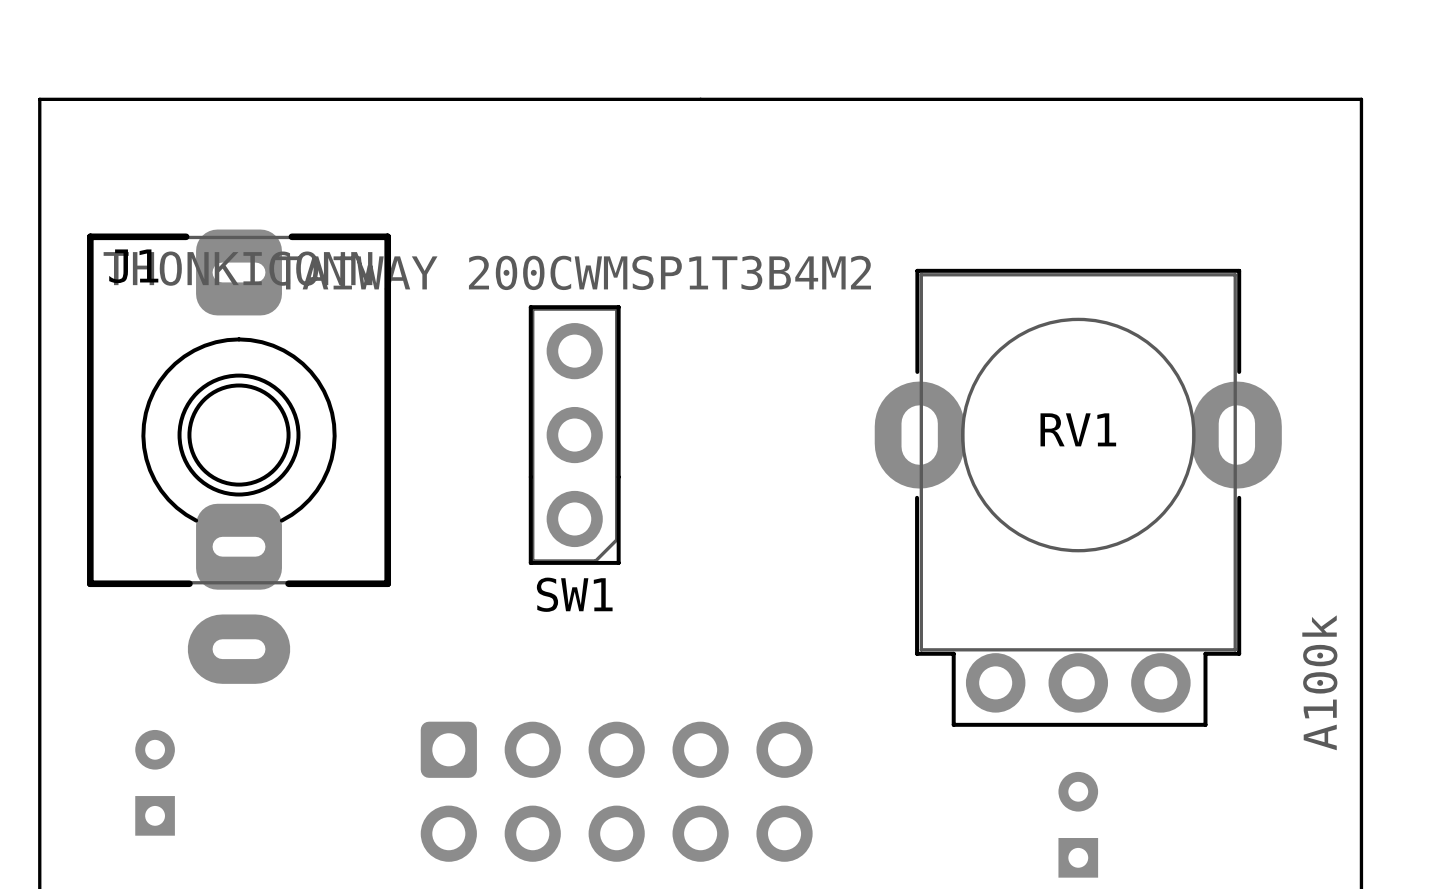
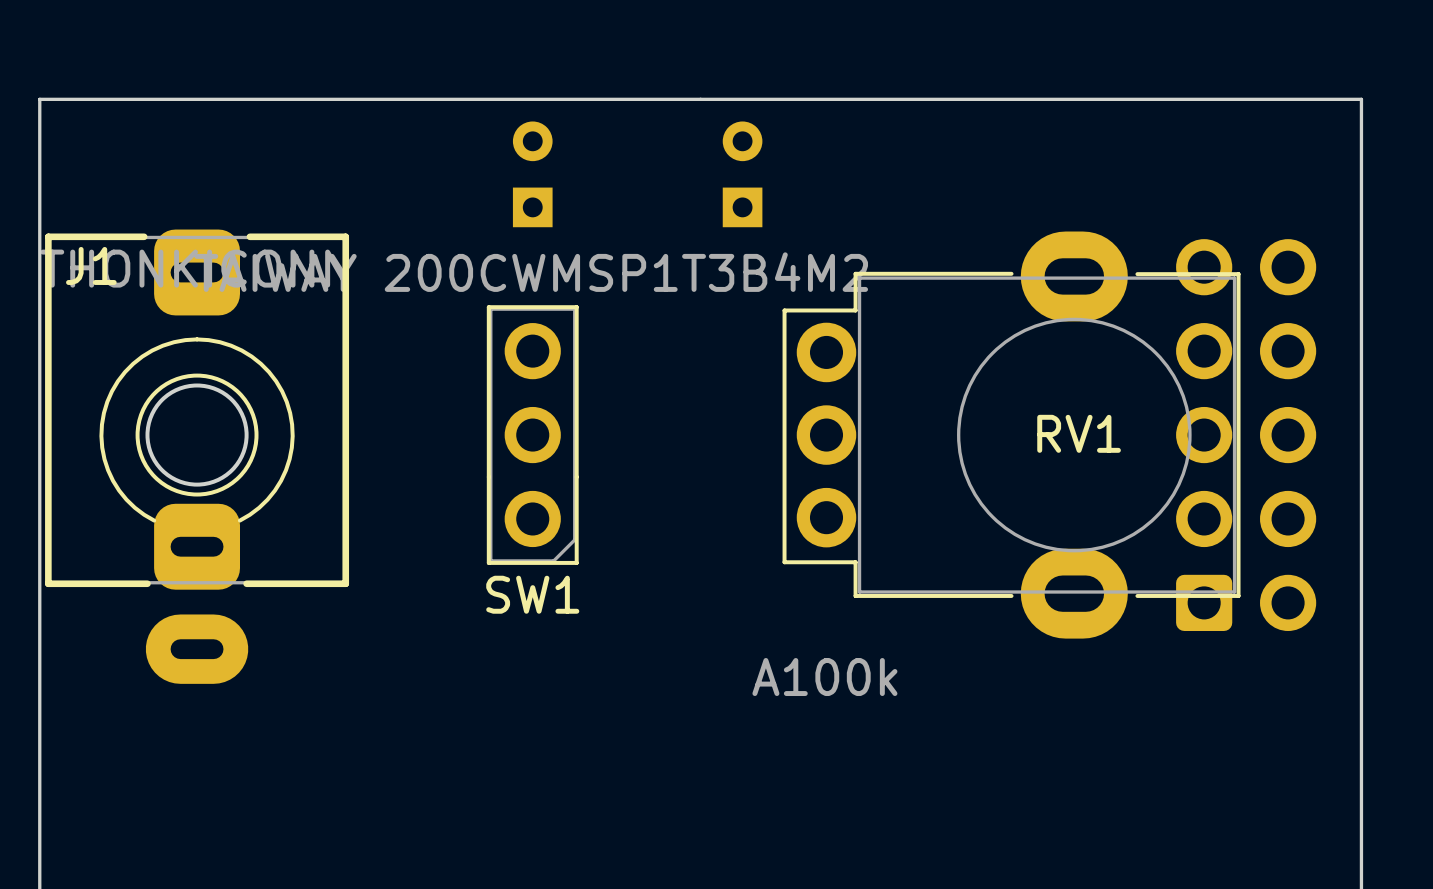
part: none -> (532, 174)
part: none -> (742, 174)
SW1 position: (574, 435) -> (532, 435)
J1 position: (239, 456) -> (197, 456)
RV1 rotation: 0° (1078, 497) -> 90° clockwise (1011, 435)
part: (155, 782) -> none
part rotation: 0° (616, 791) -> 90° counterclockwise (1246, 435)
part position: (616, 791) -> (1246, 435)
part: (1078, 824) -> none

